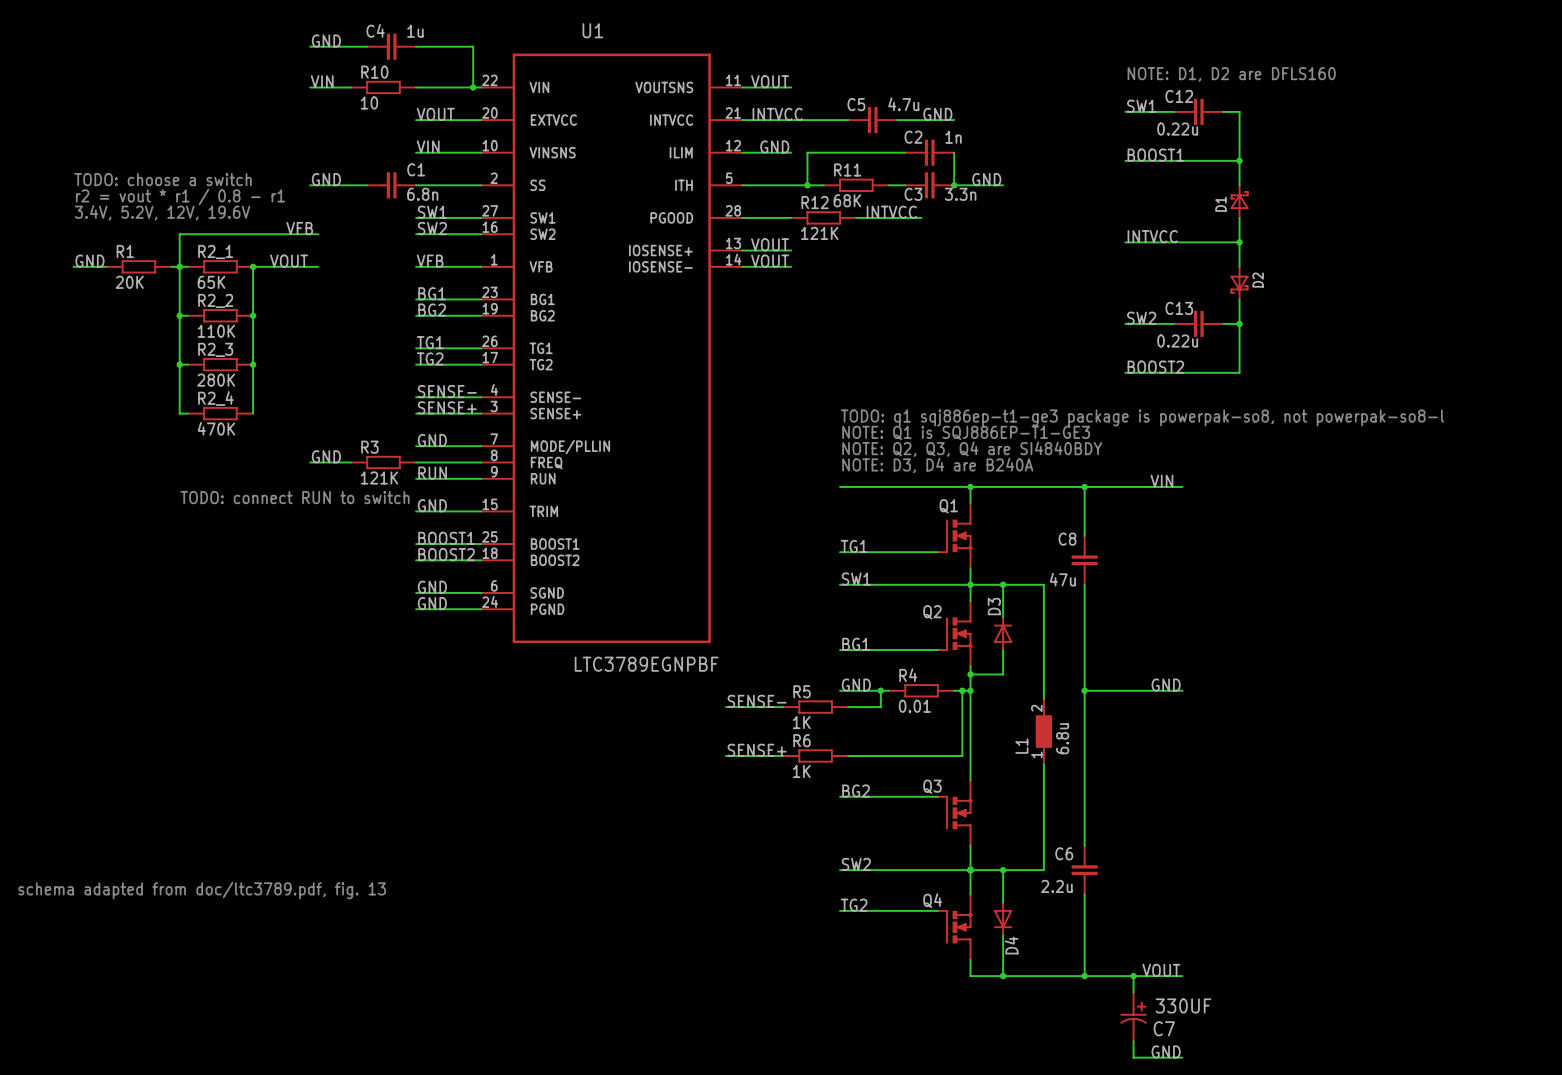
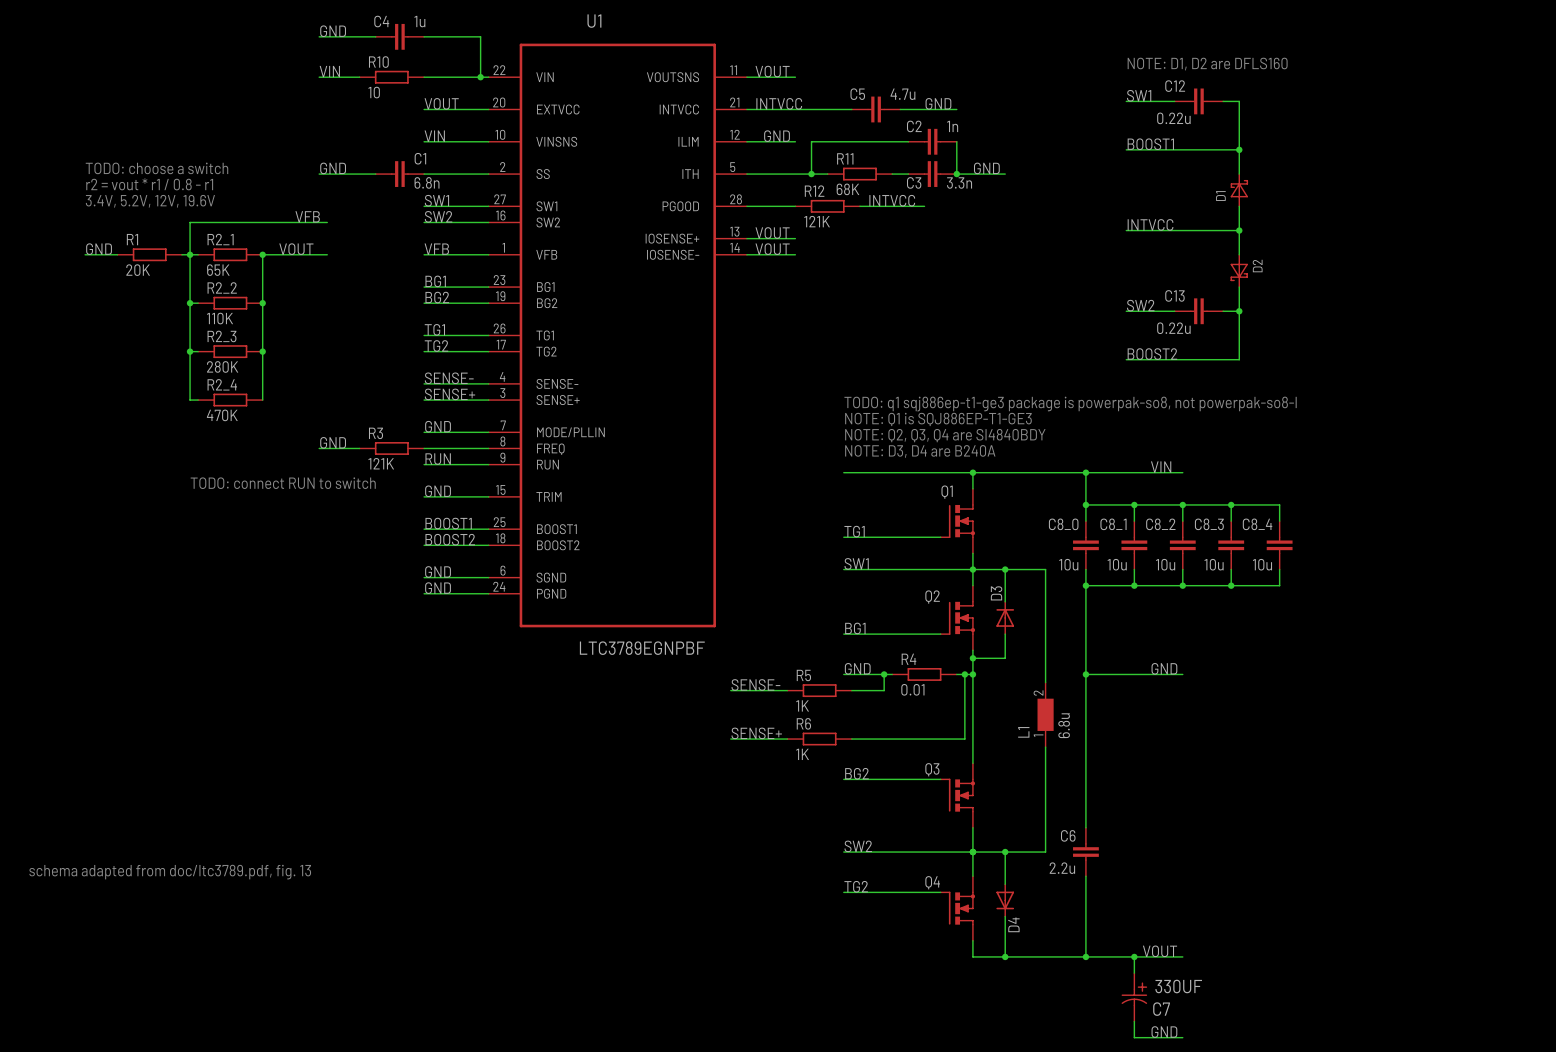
wire: none -> (1085, 504) (1279, 504) (1279, 521)
junction: none -> (1085, 504)
wire: none -> (1134, 504) (1134, 521)
junction: none -> (1134, 504)
wire: none -> (1182, 504) (1182, 521)
junction: none -> (1182, 504)
wire: none -> (1231, 504) (1231, 521)
junction: none -> (1231, 504)
C8 name: C8 (1067, 539) -> C8_0 (1063, 524)
C8_1: none -> 10u (1134, 545)
C8_2: none -> 10u (1182, 545)
C8_3: none -> 10u (1231, 545)
C8_4: none -> 10u (1279, 545)
C8 value: 47u (1062, 579) -> 10u (1068, 564)
wire: none -> (1134, 569) (1134, 585)
wire: none -> (1182, 569) (1182, 585)
wire: none -> (1231, 569) (1231, 585)
wire: none -> (1279, 569) (1279, 585) (1085, 585)
junction: none -> (1085, 585)
junction: none -> (1134, 585)
junction: none -> (1182, 585)
junction: none -> (1231, 585)

